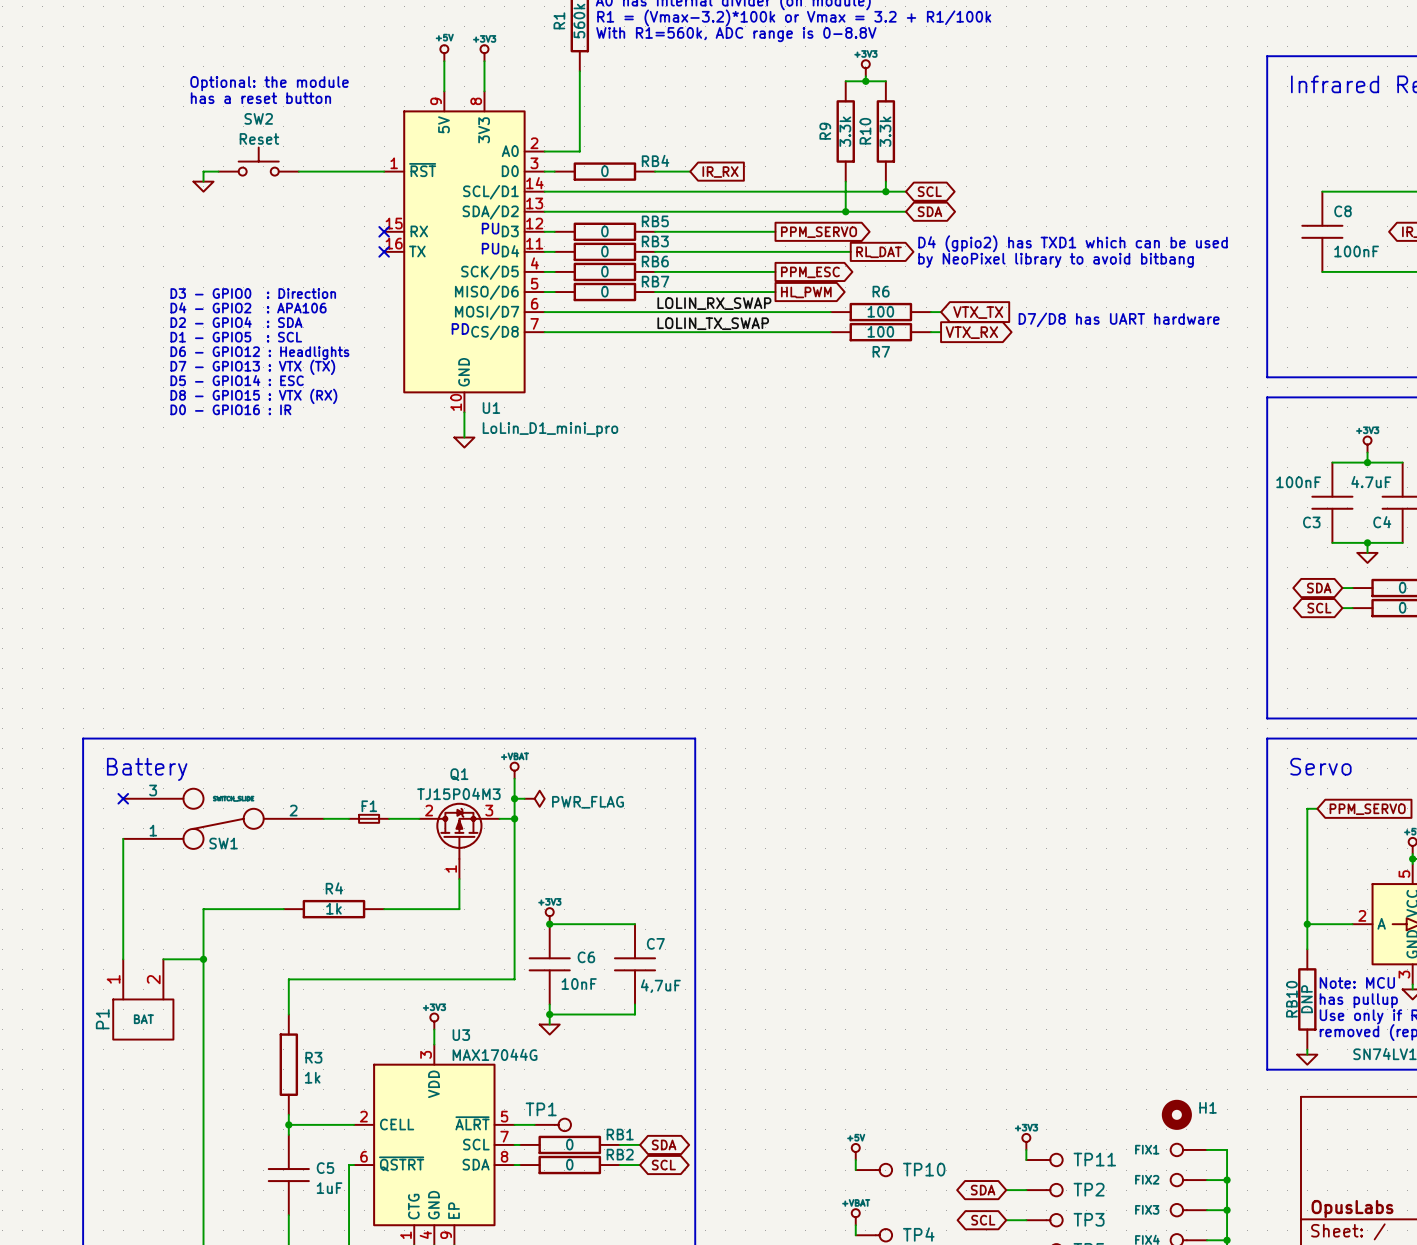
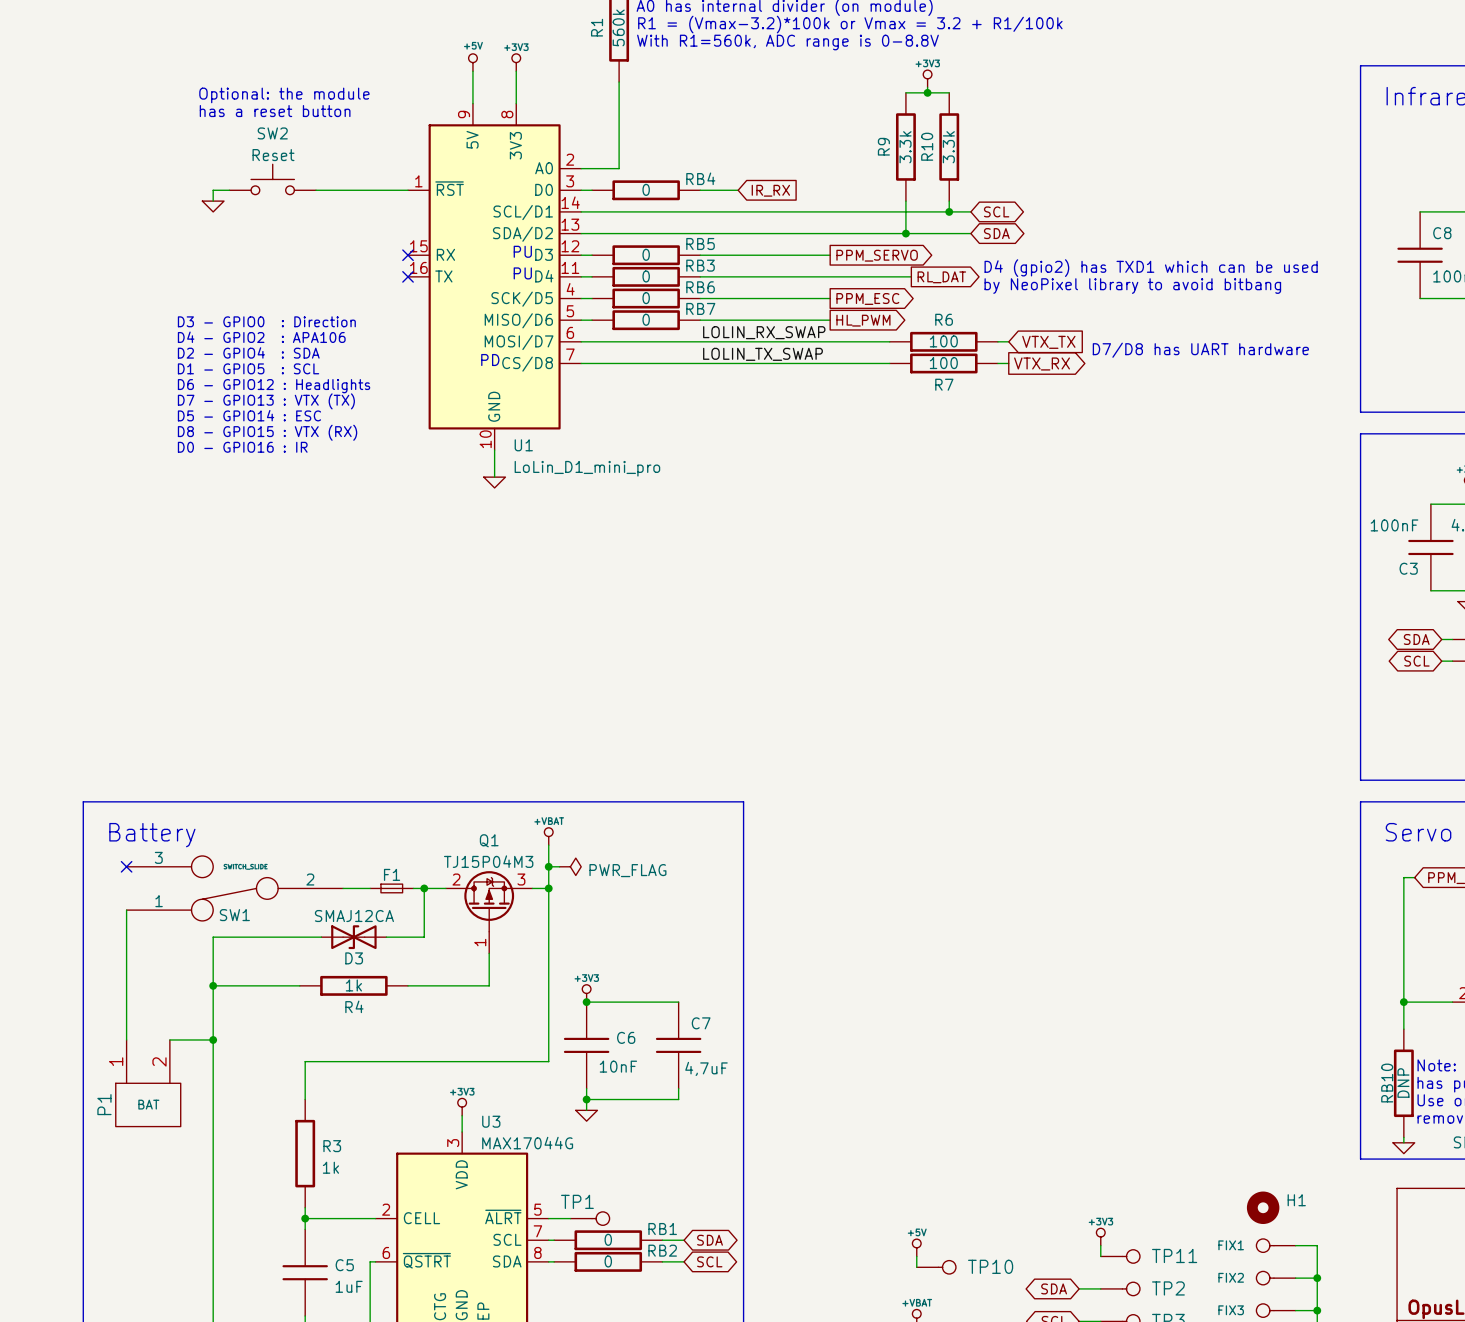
wire: none -> (424, 888) (424, 937) (386, 937)
junction: none -> (424, 888)
wire: none -> (321, 937) (213, 937) (213, 985)
D3: none -> SMAJ12CA (353, 937)
R4 name position: R4 (334, 888) -> R4 (354, 1006)
junction: none -> (213, 985)

